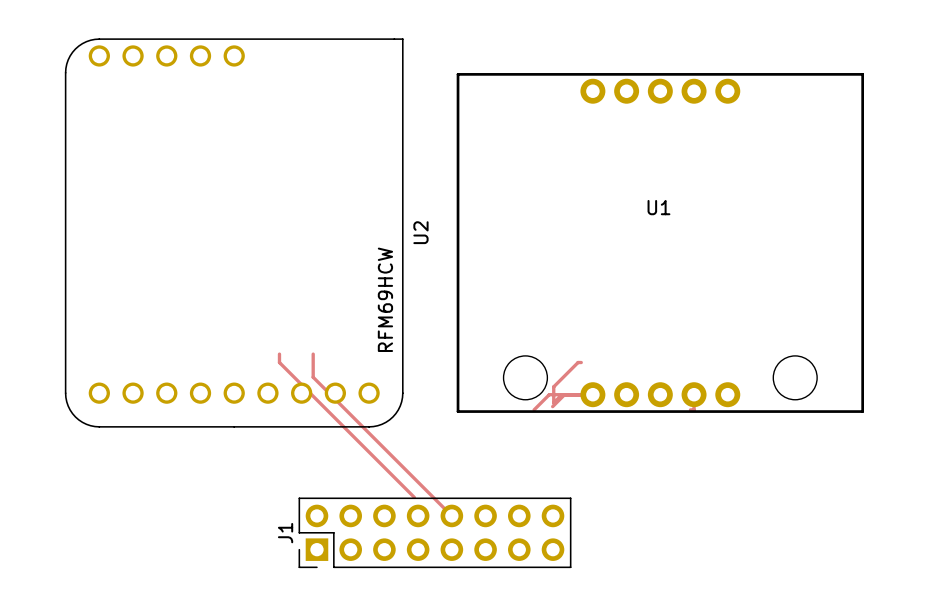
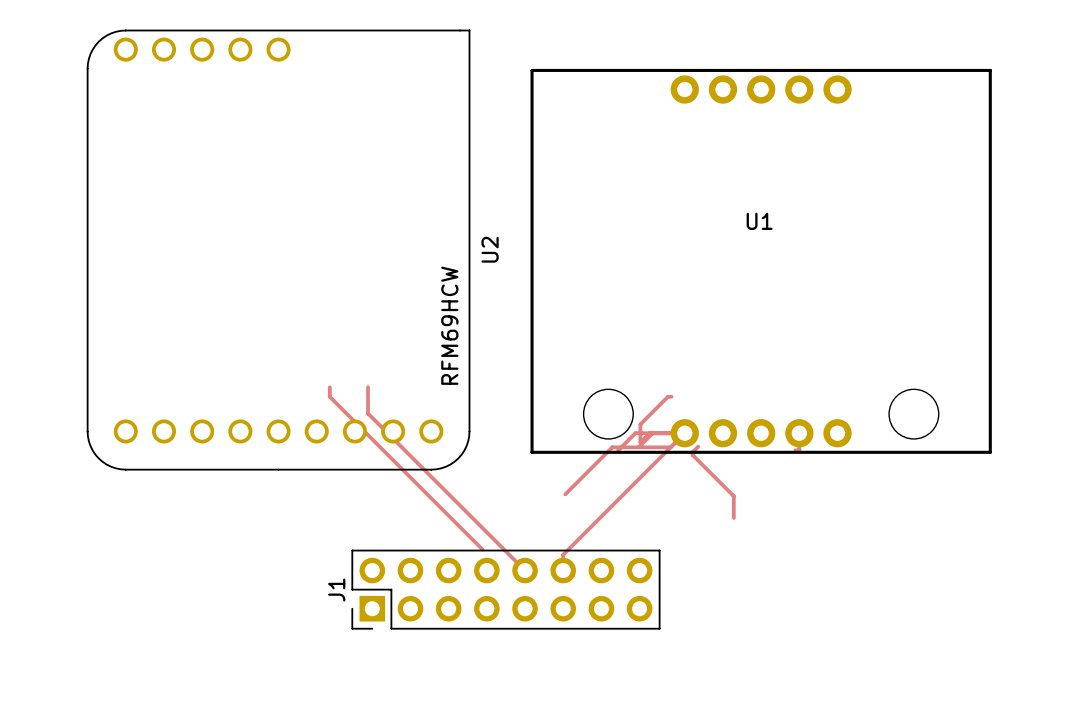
track: none -> (684, 433) (563, 554) (563, 570)
track: none -> (698, 446) (692, 452) (692, 455) (733, 496) (733, 517)
track: none -> (670, 447) (612, 447) (565, 494)

